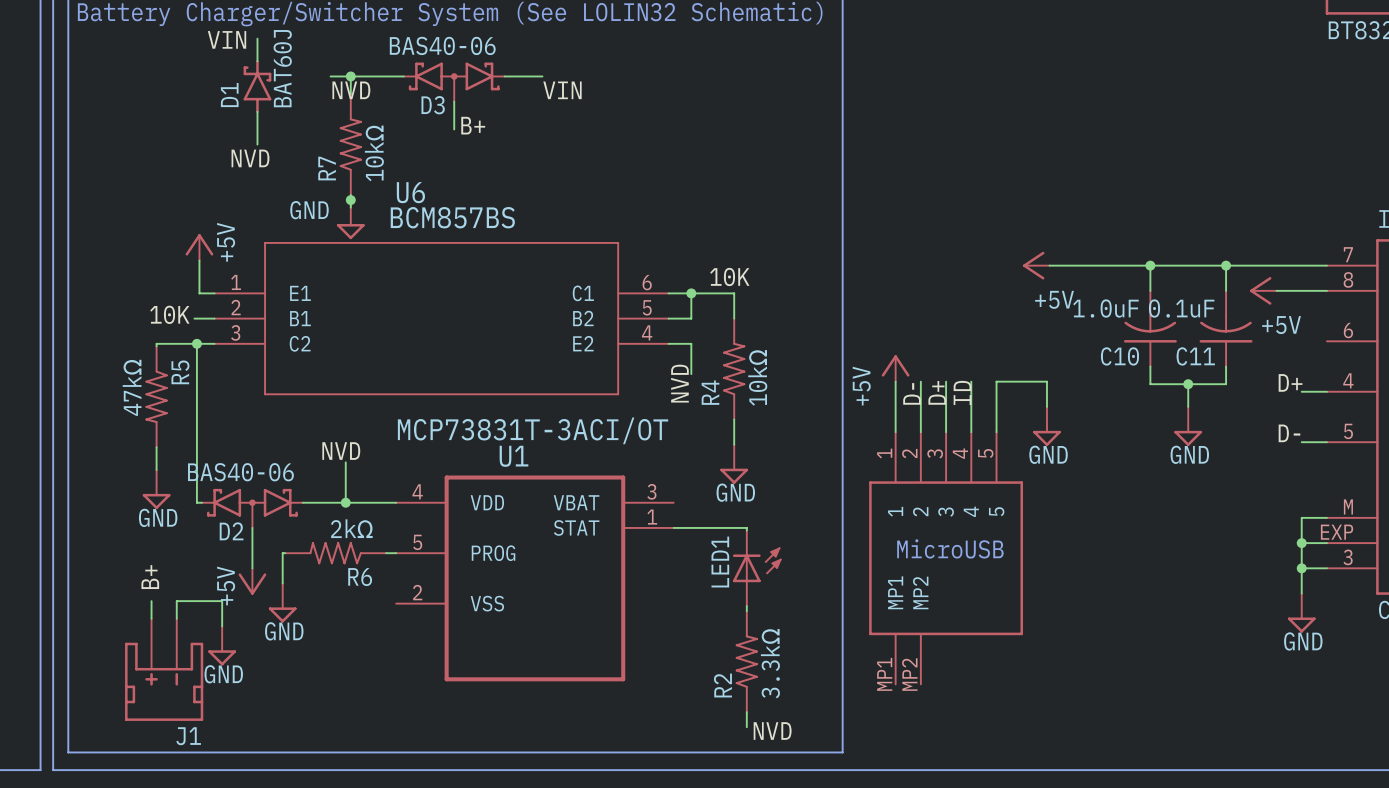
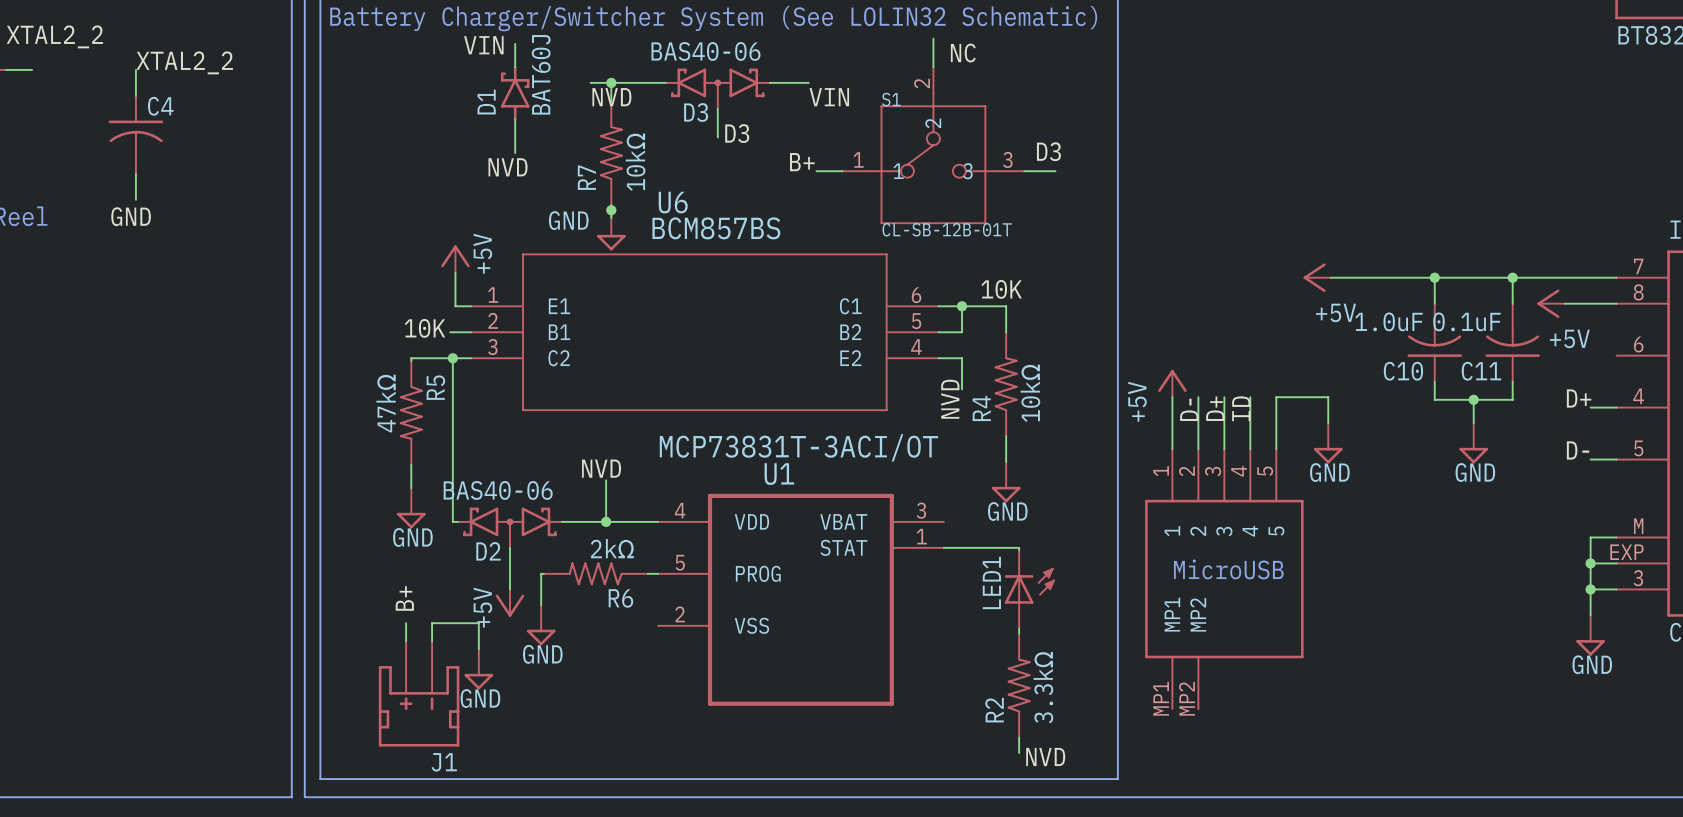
wire: none -> (933, 38) (933, 67)
label: none -> NC (963, 53)
label: B+ (473, 125) -> D3 (737, 133)
S1: none -> CL-SB-12B-01T (933, 145)
label: none -> D3 (1048, 151)
label: none -> B+ (802, 162)
wire: none -> (816, 171) (842, 171)
wire: none -> (1024, 171) (1055, 171)

